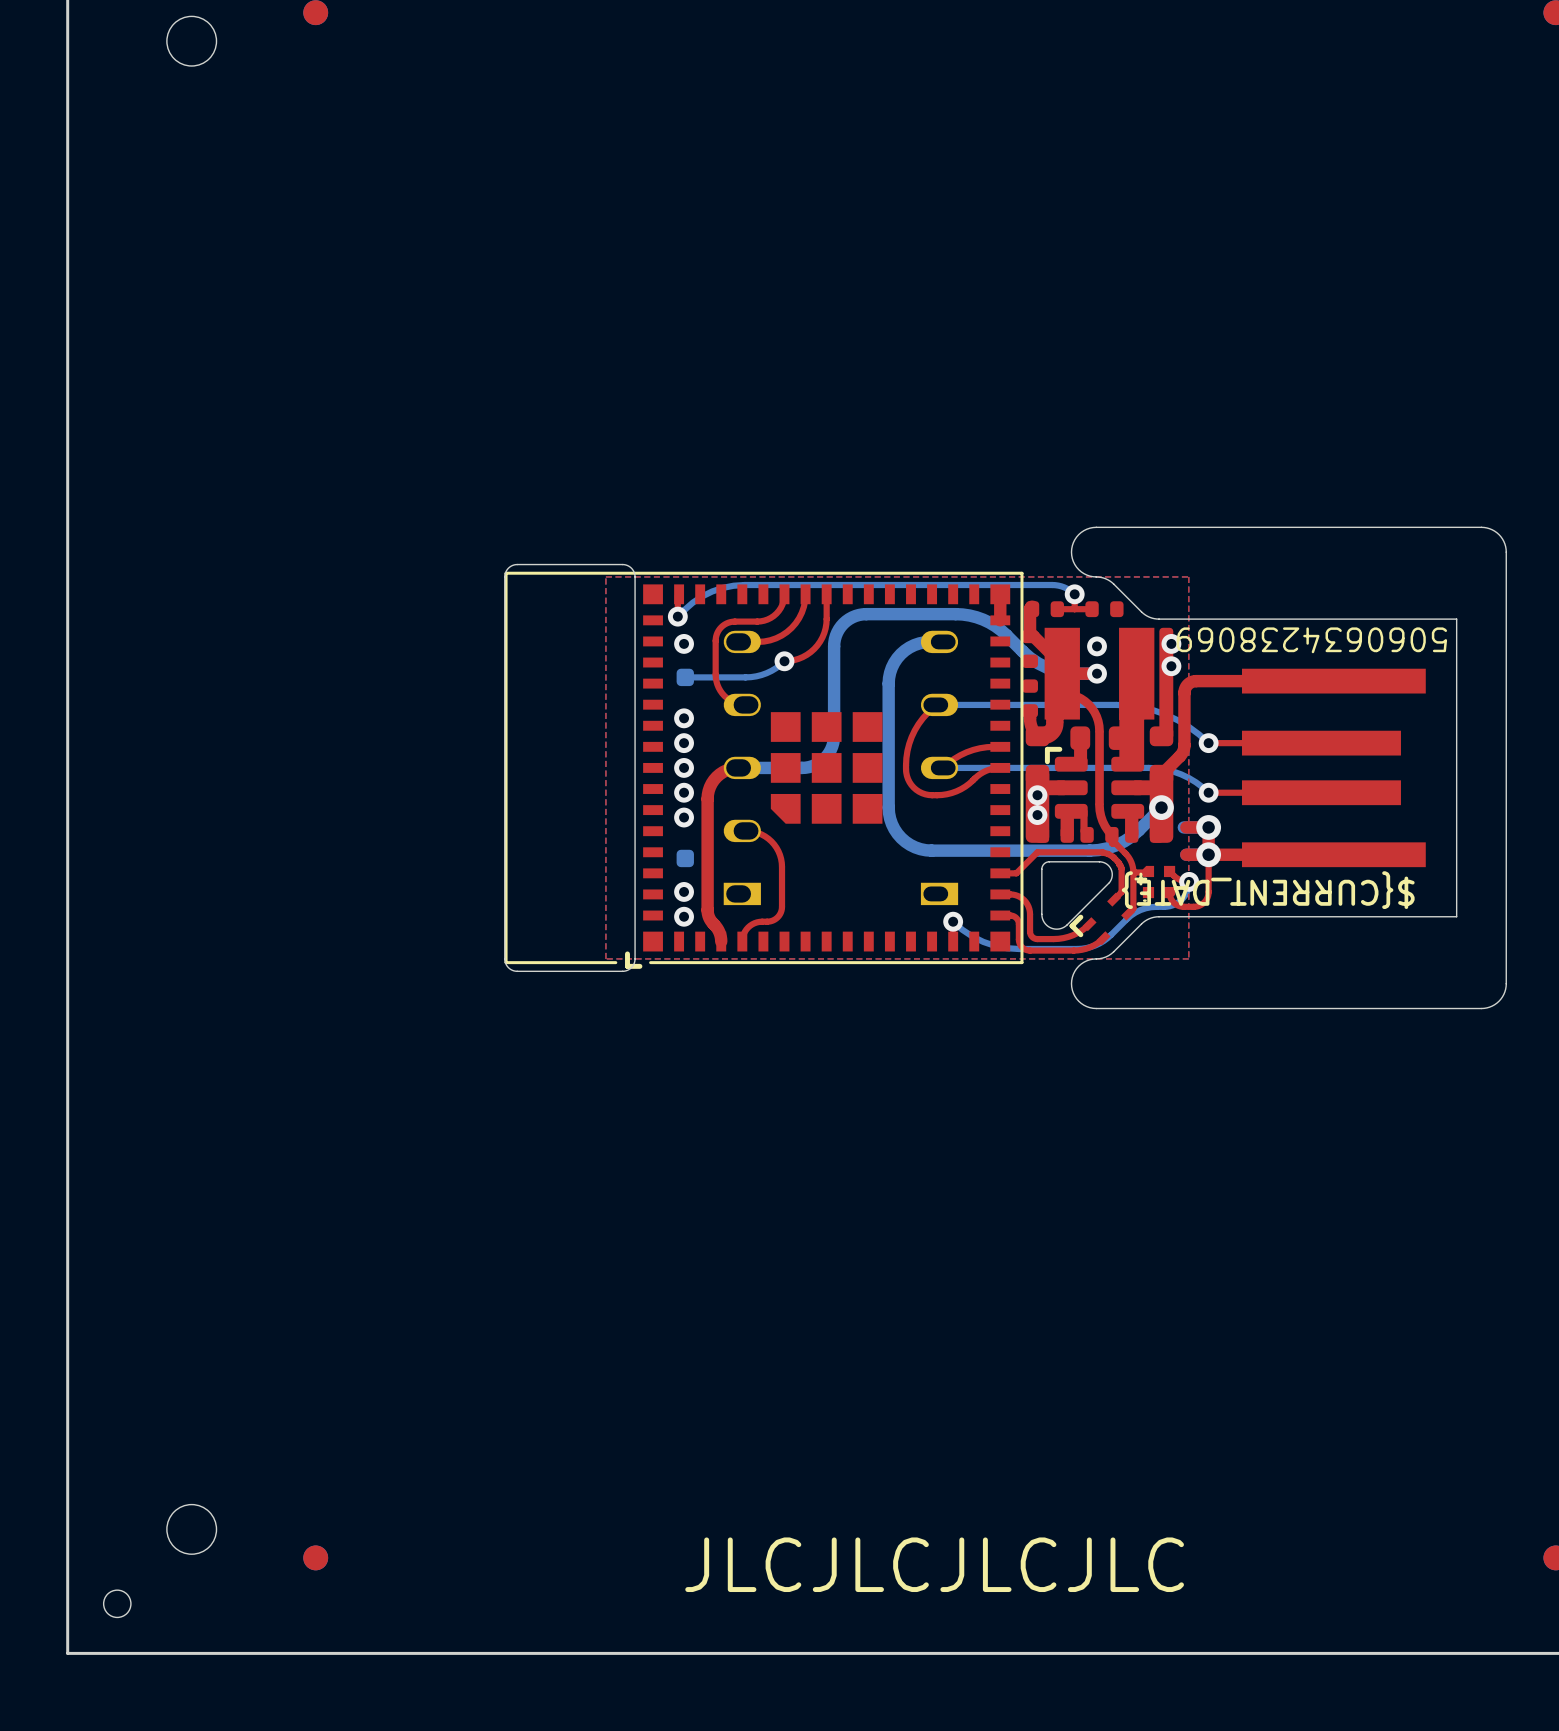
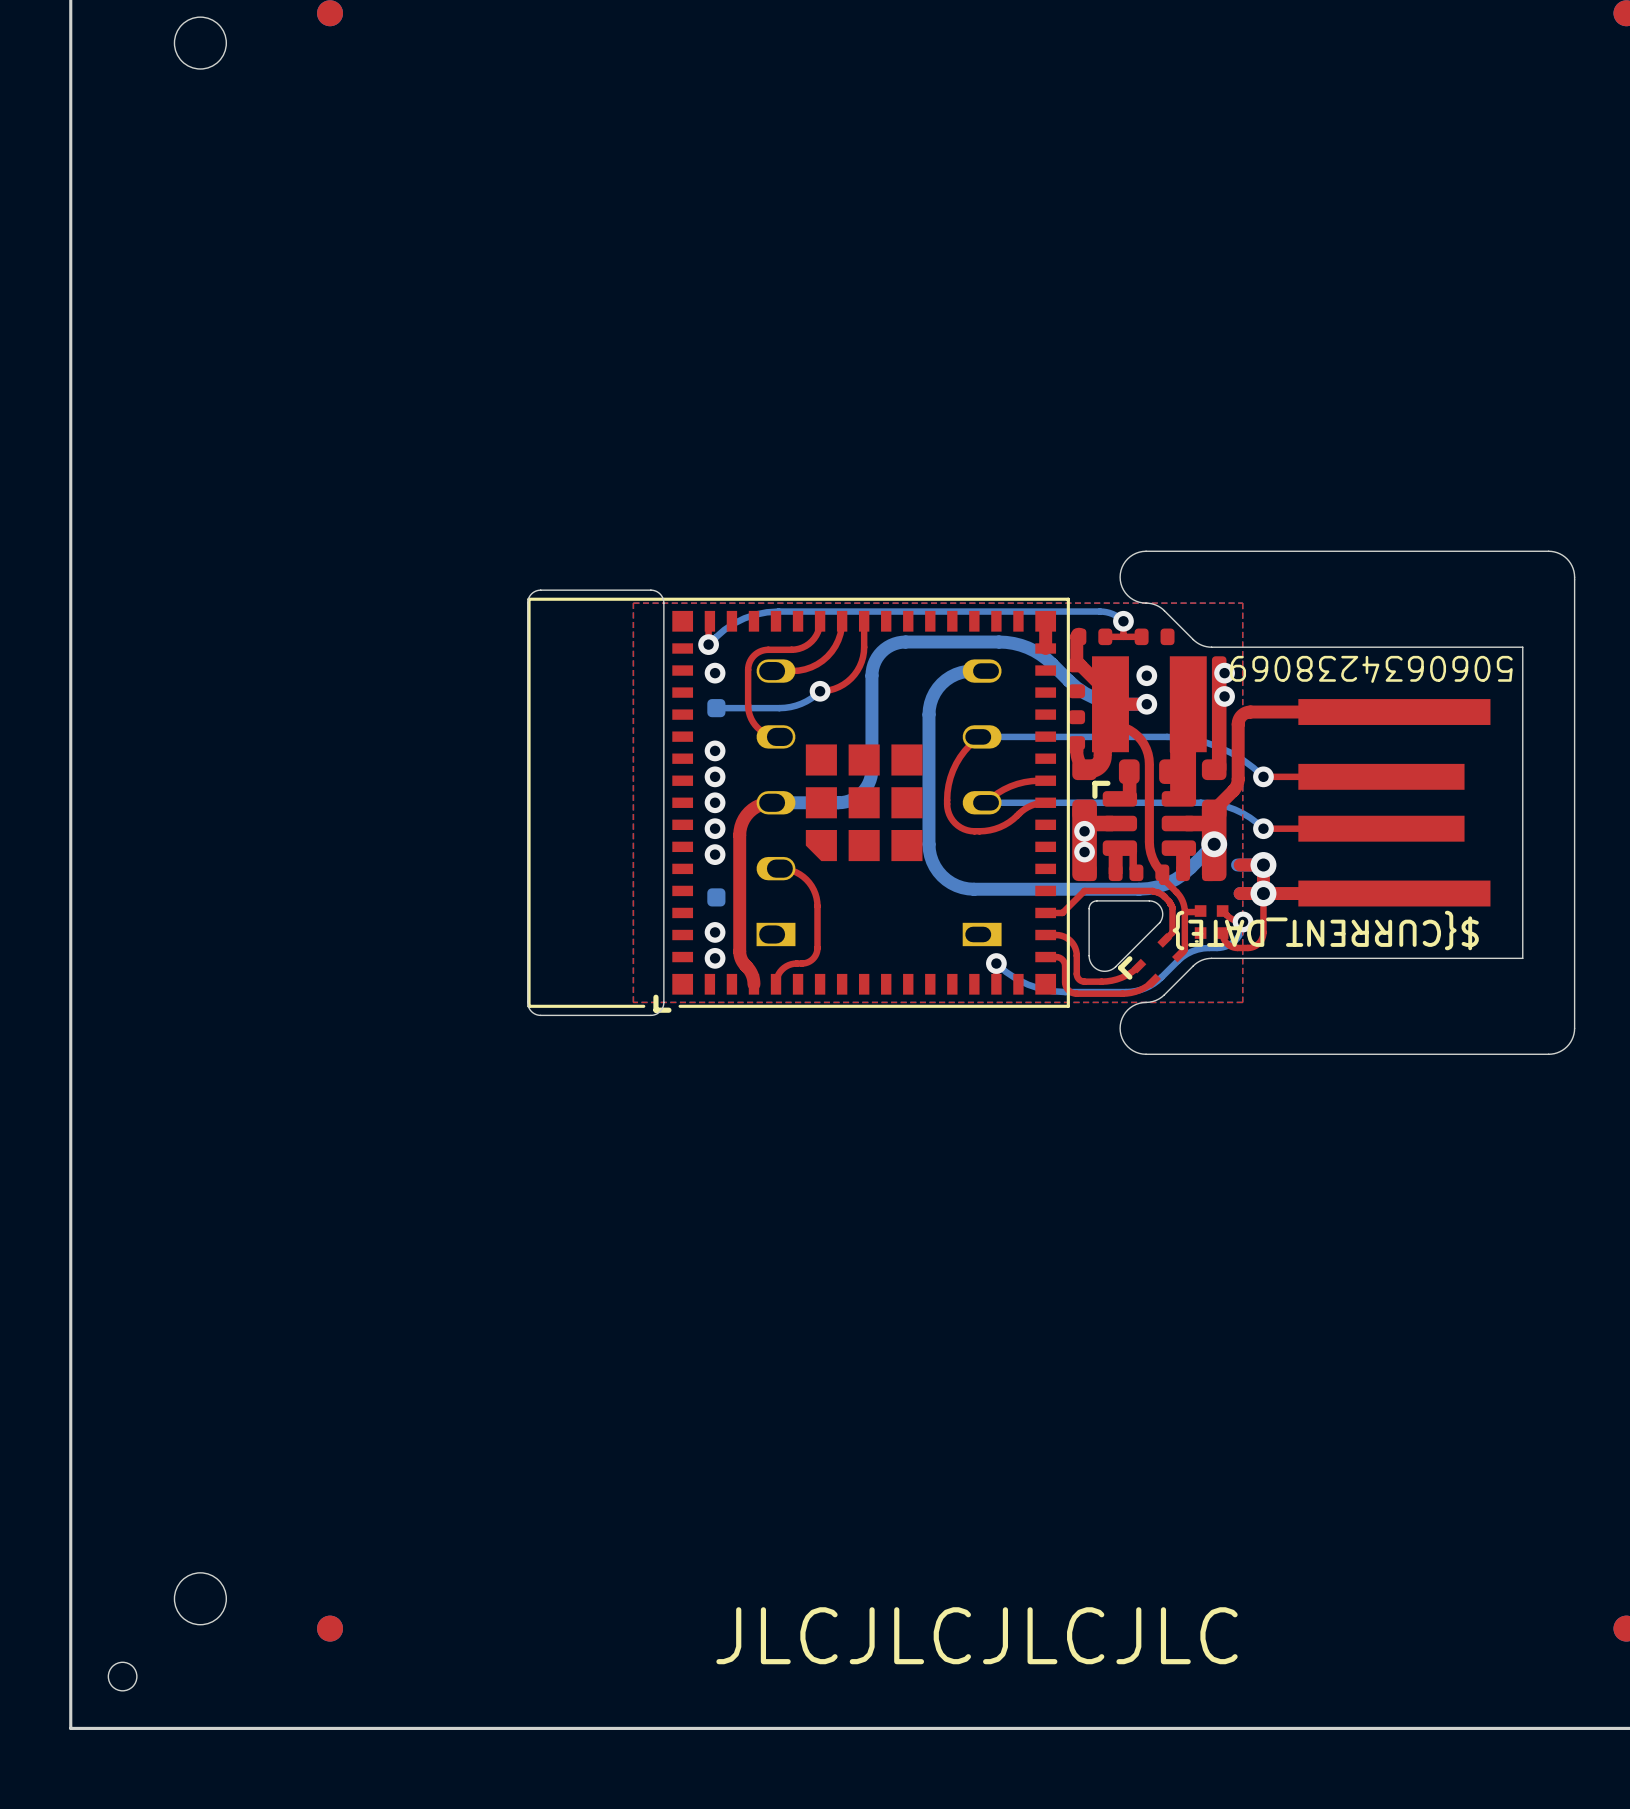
part footprint: [1134, 865, 1176, 902] -> [1194, 905, 1229, 943]

